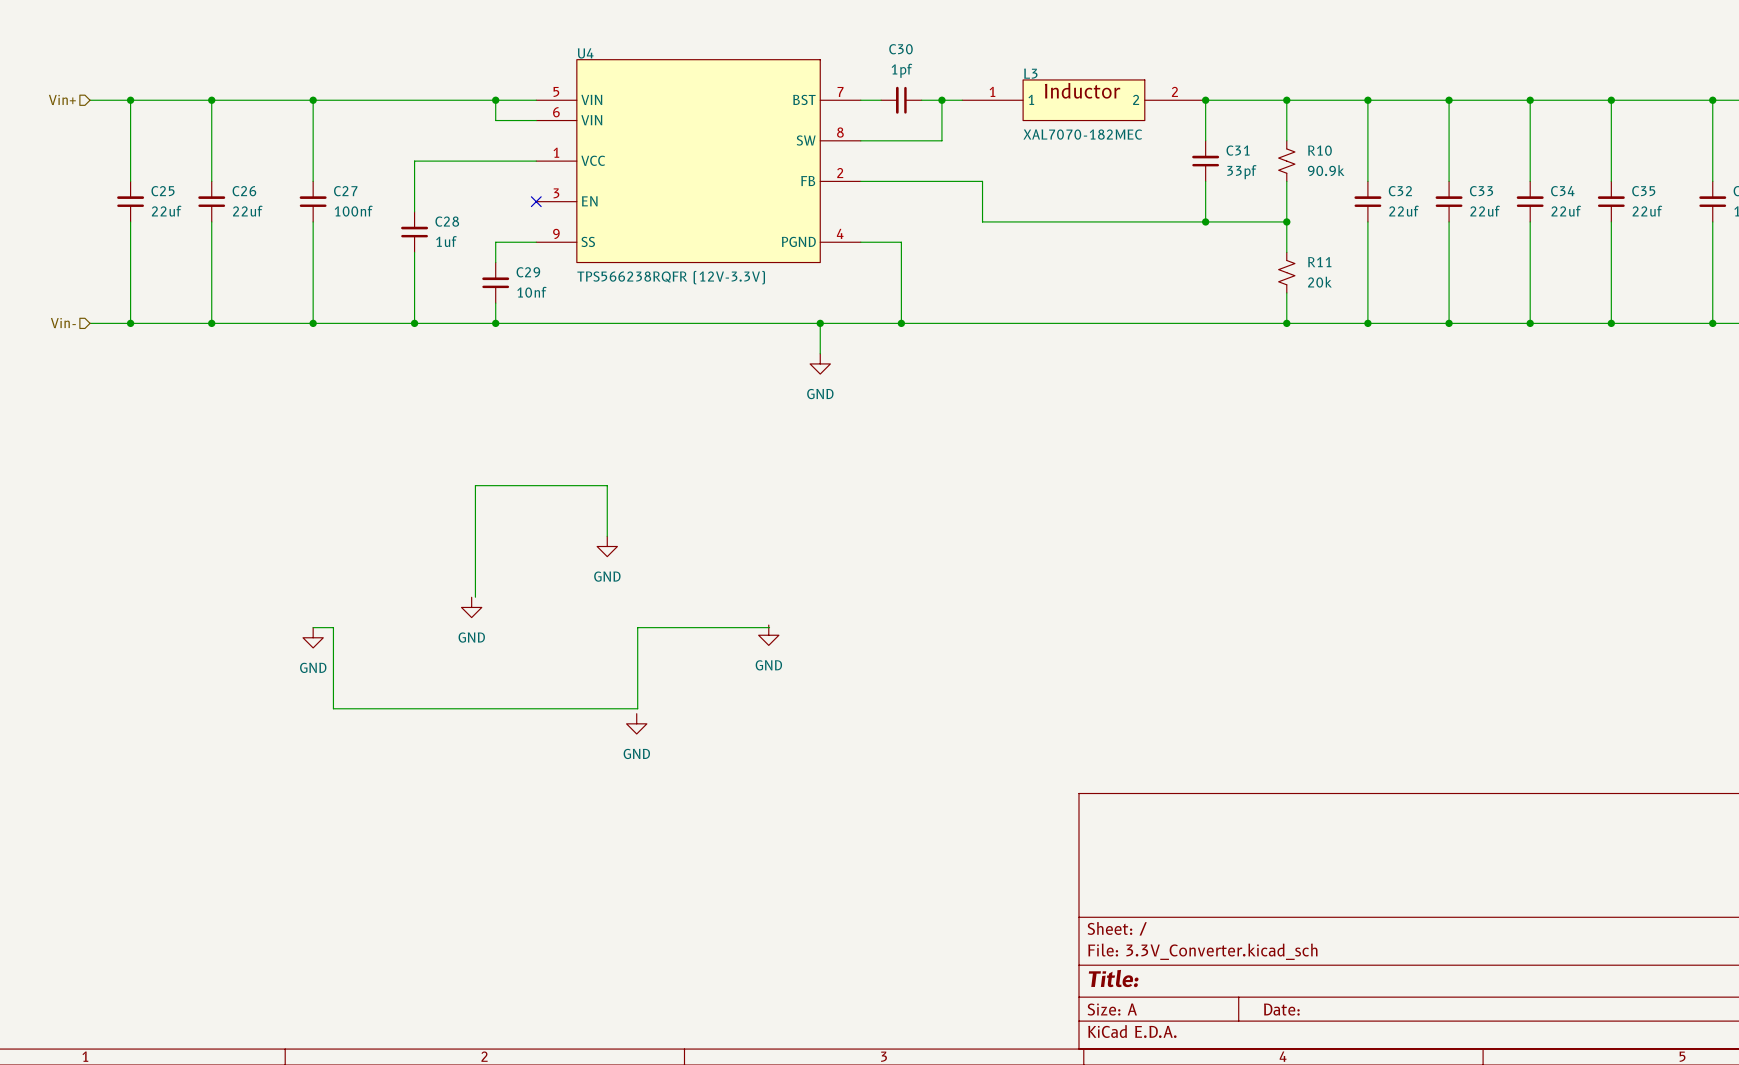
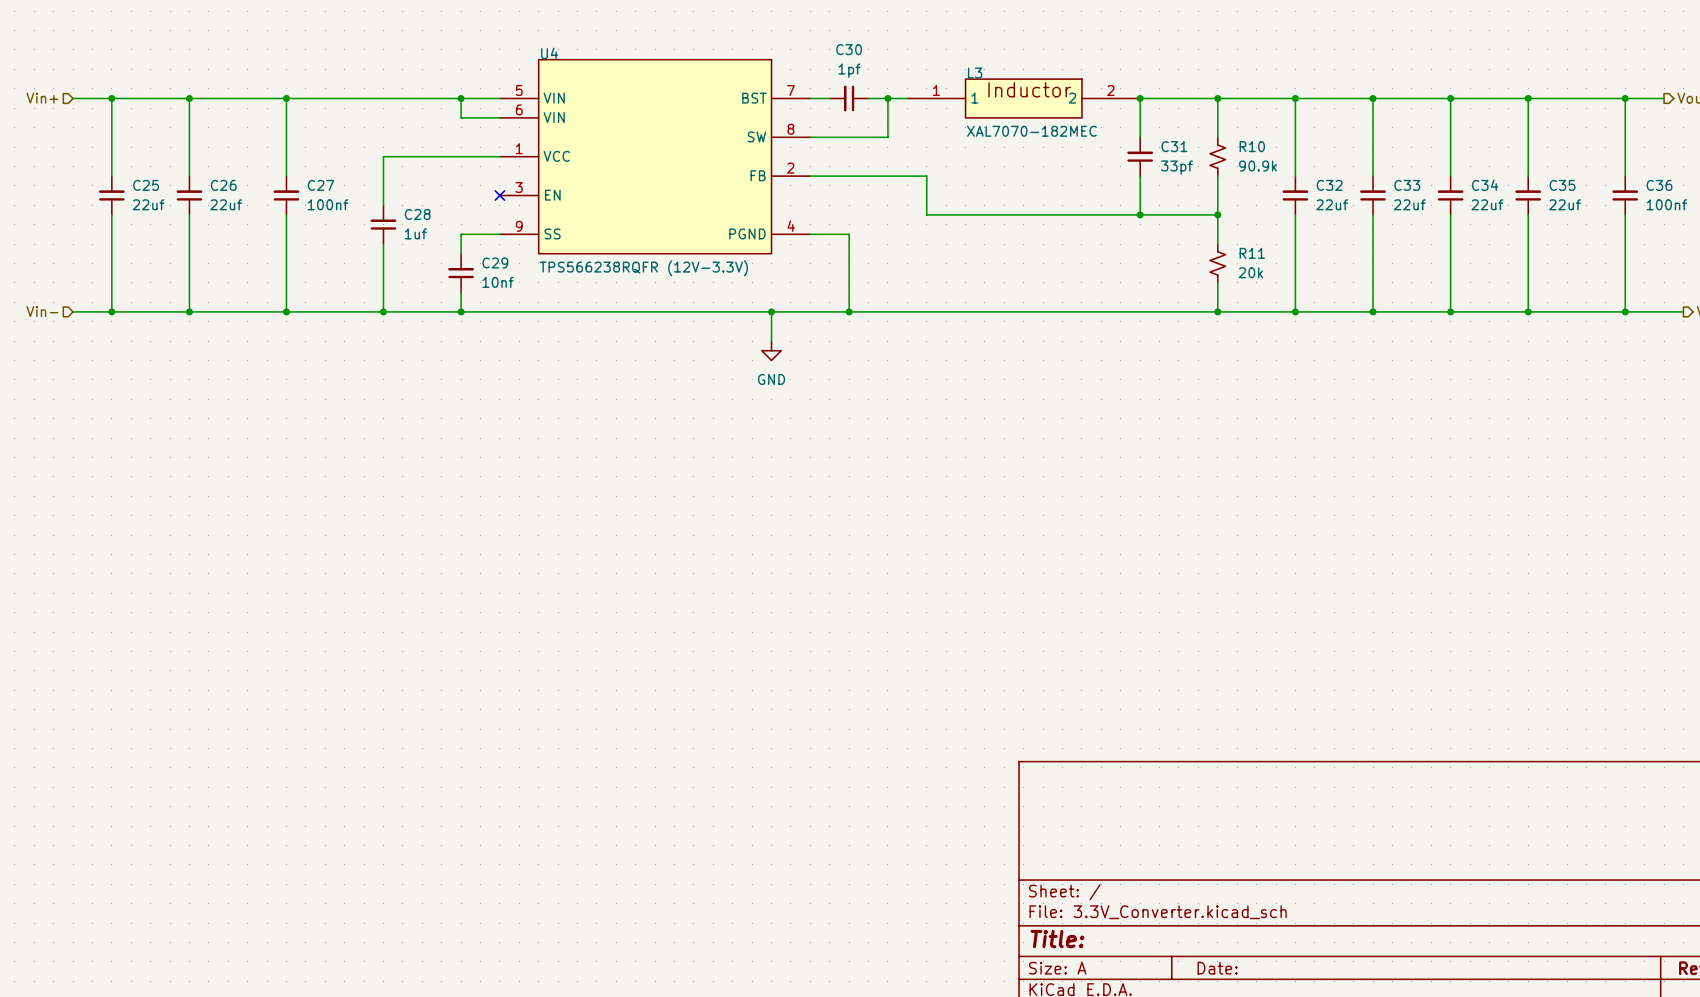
wire: (607, 536) (607, 485) (475, 485) (475, 597) -> none
power symbol: GND (607, 546) -> none
power symbol: GND (471, 607) -> none
wire: (313, 627) (333, 627) (333, 708) (637, 708) (637, 627) (769, 627) -> none
power symbol: GND (768, 635) -> none
power symbol: GND (313, 637) -> none
power symbol: GND (636, 723) -> none

